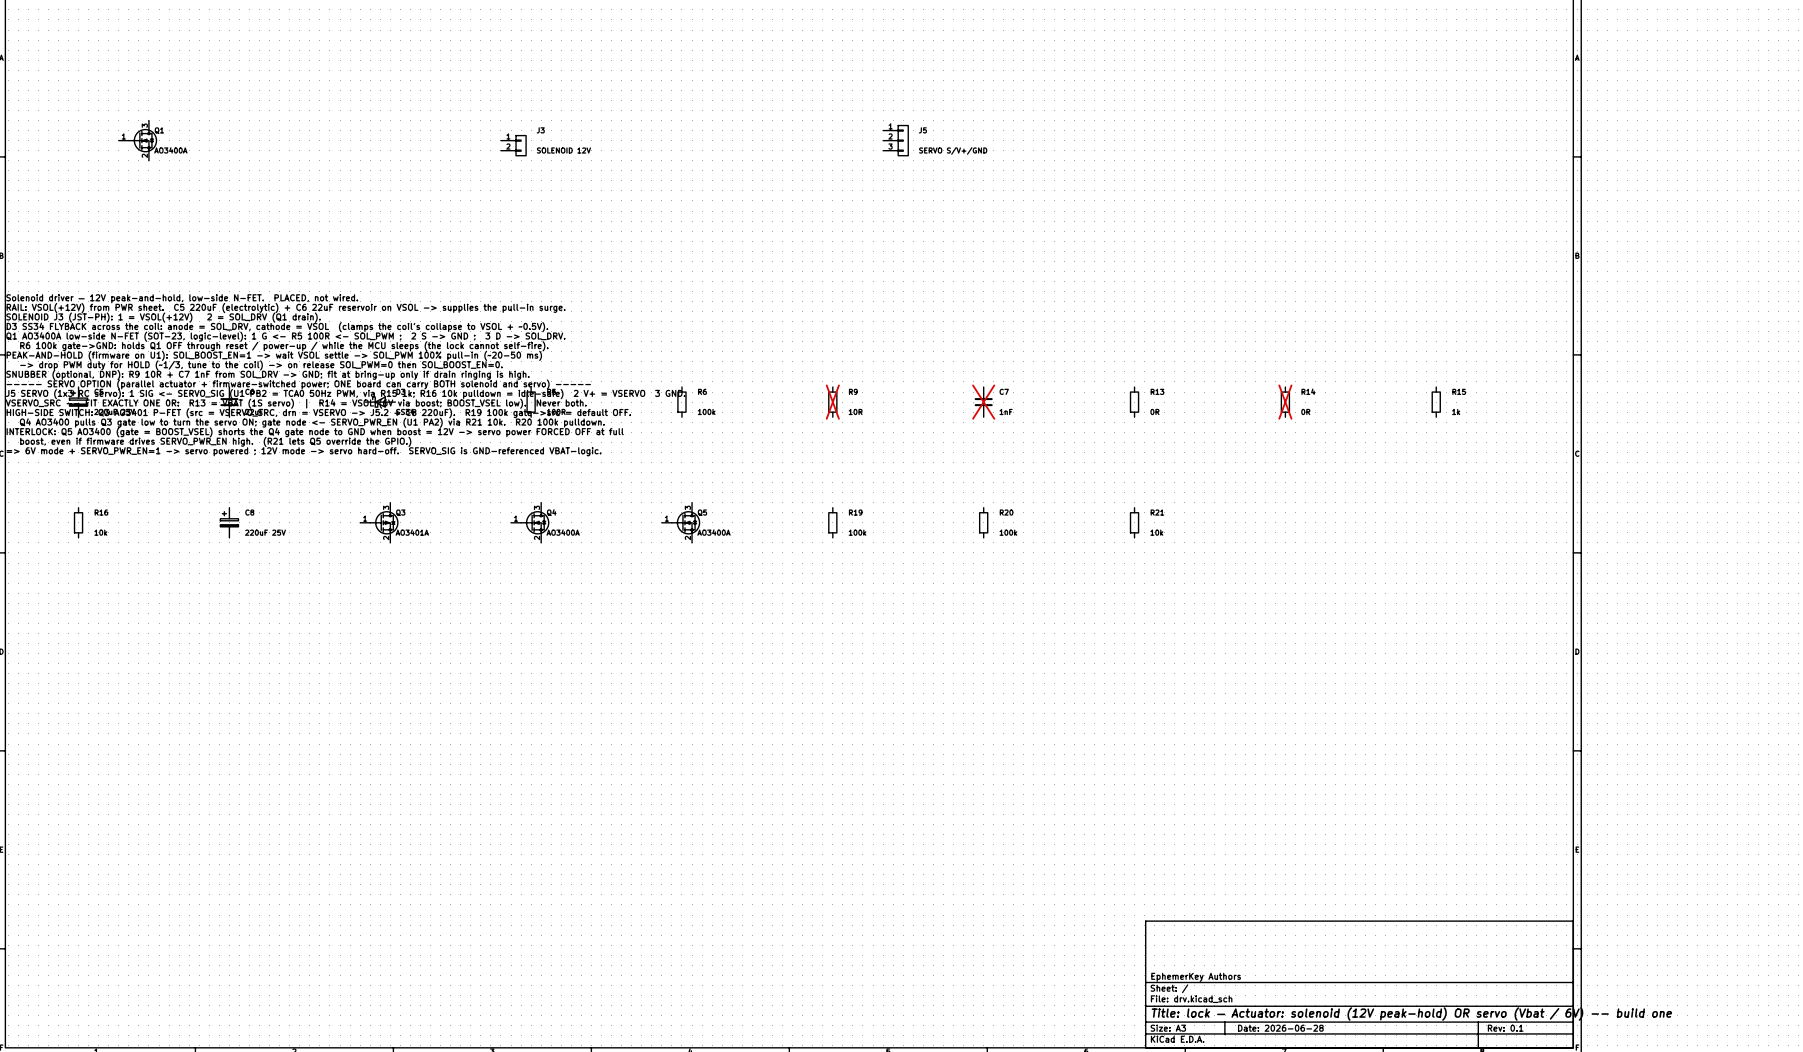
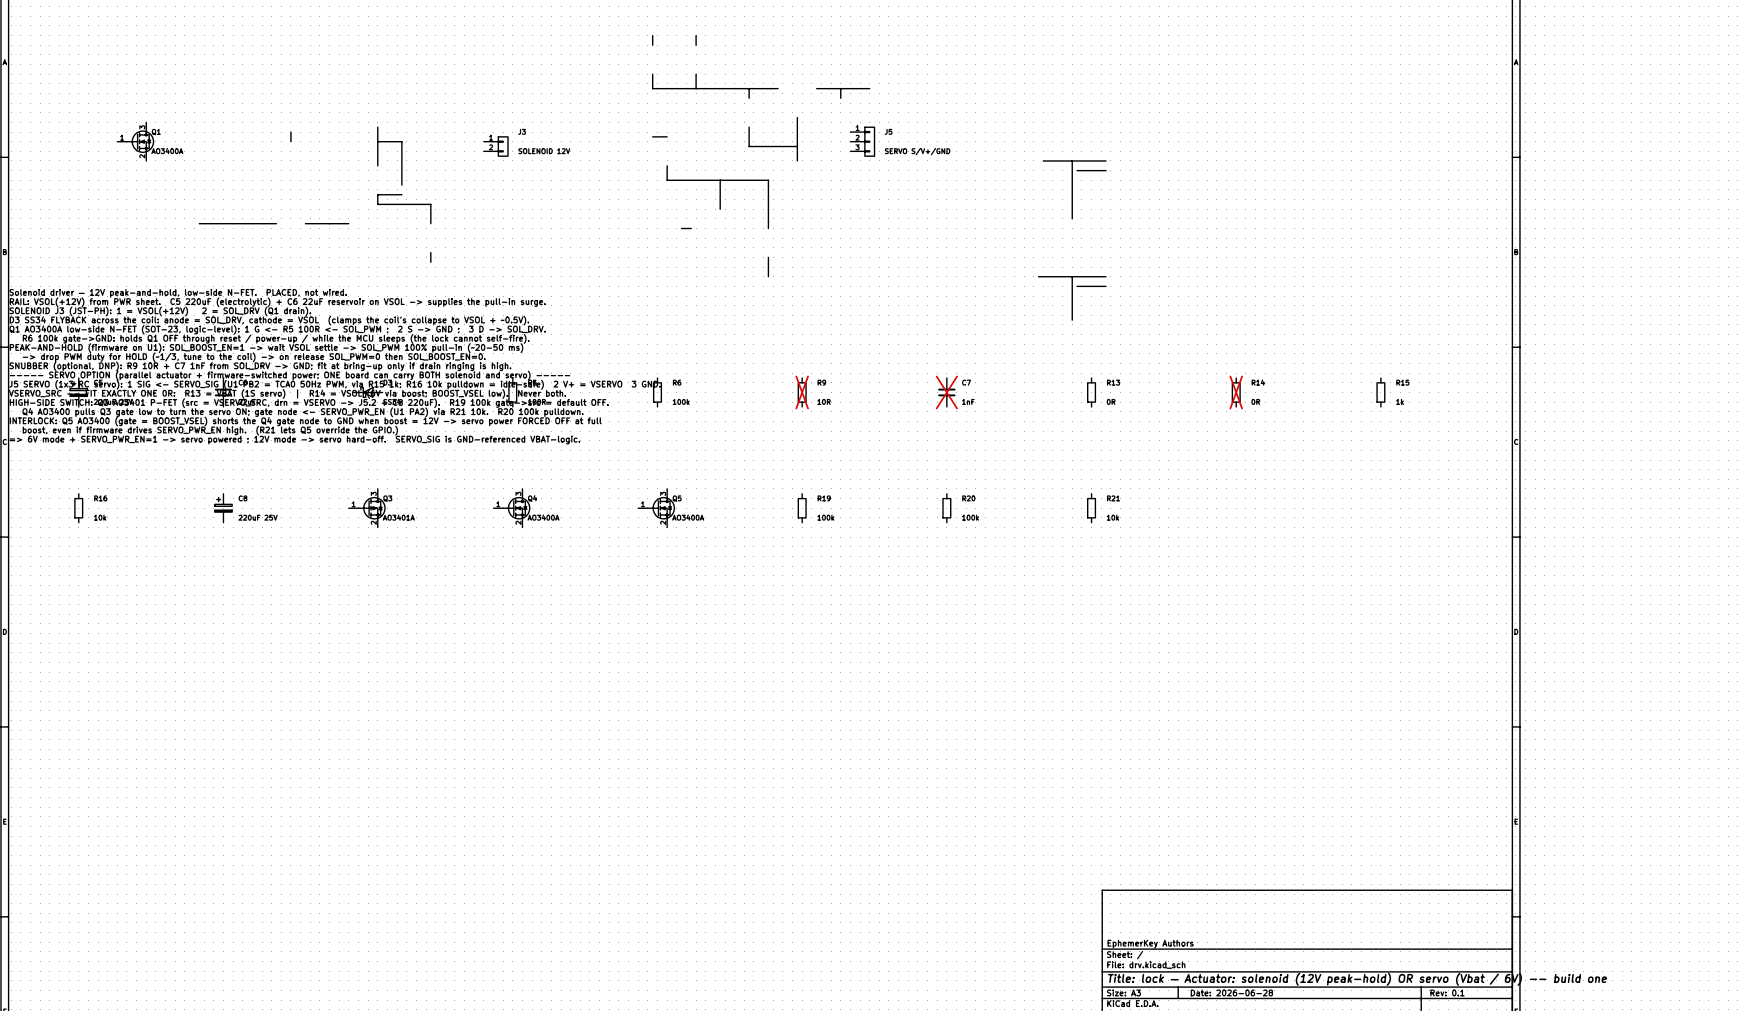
wire: none -> (652, 35) (652, 45)
wire: none -> (696, 35) (696, 45)
wire: none -> (652, 74) (652, 88) (778, 88)
wire: none -> (696, 74) (696, 88)
wire: none -> (749, 88) (749, 98)
wire: none -> (816, 88) (869, 88)
wire: none -> (840, 88) (840, 98)
wire: none -> (797, 117) (797, 160)
wire: none -> (377, 127) (377, 165)
wire: none -> (749, 127) (749, 146) (797, 146)
wire: none -> (290, 132) (290, 141)
wire: none -> (652, 136) (667, 136)
wire: none -> (377, 141) (401, 141) (401, 185)
wire: none -> (1043, 160) (1106, 160)
wire: none -> (1072, 160) (1072, 218)
wire: none -> (667, 165) (667, 180) (768, 180) (768, 228)
wire: none -> (1077, 170) (1106, 170)
wire: none -> (720, 180) (720, 209)
wire: none -> (401, 194) (377, 194) (377, 204) (430, 204) (430, 223)
wire: none -> (199, 223) (276, 223)
wire: none -> (305, 223) (348, 223)
wire: none -> (681, 228) (691, 228)
wire: none -> (430, 252) (430, 262)
wire: none -> (768, 257) (768, 276)
wire: none -> (1038, 276) (1106, 276)
wire: none -> (1072, 276) (1072, 320)
wire: none -> (1077, 286) (1106, 286)

